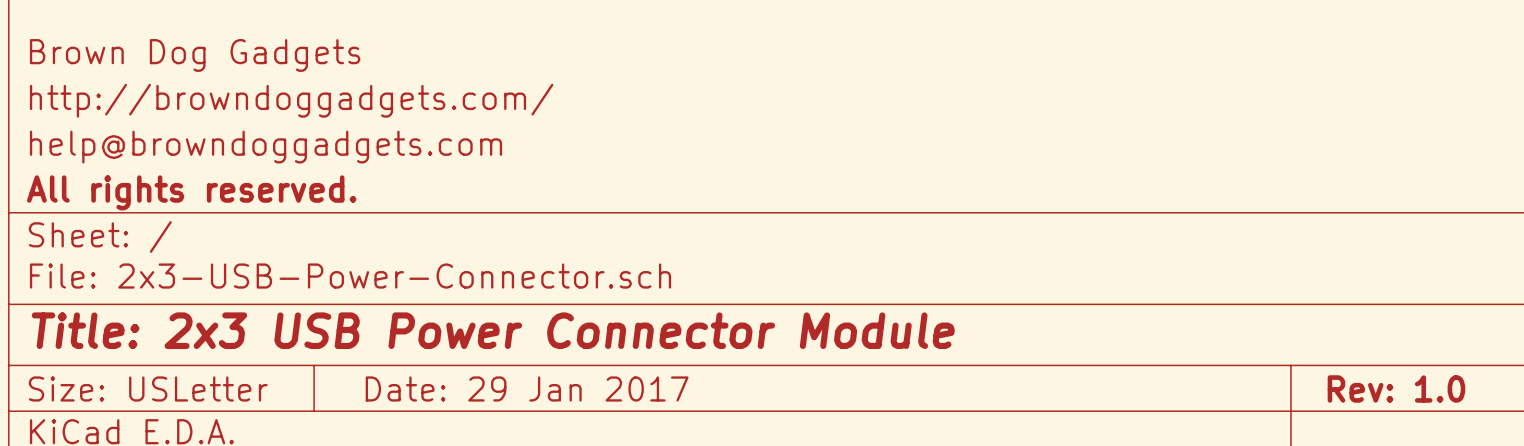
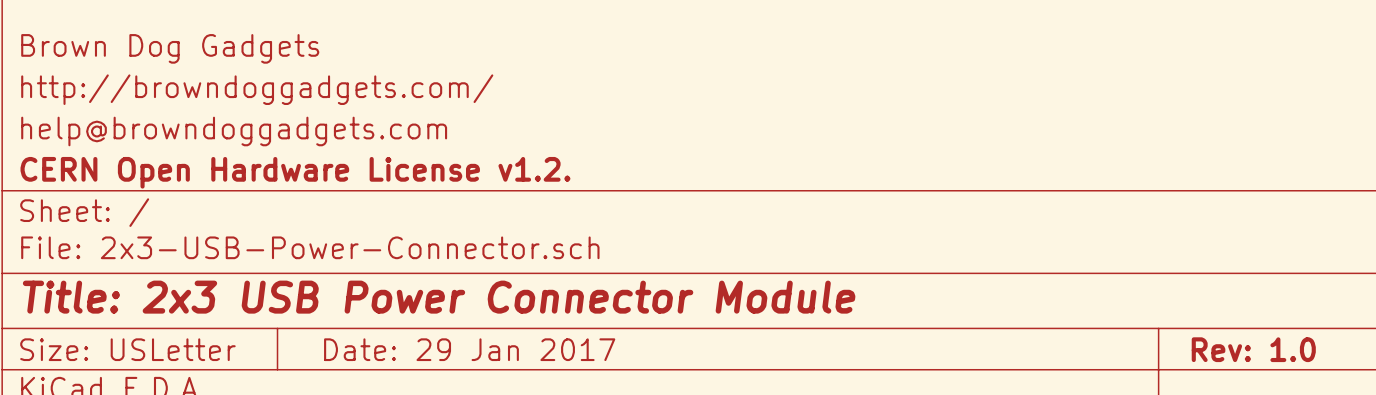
title block: All rights reserved. (191, 192) -> CERN Open Hardware License v1.2. (295, 172)

